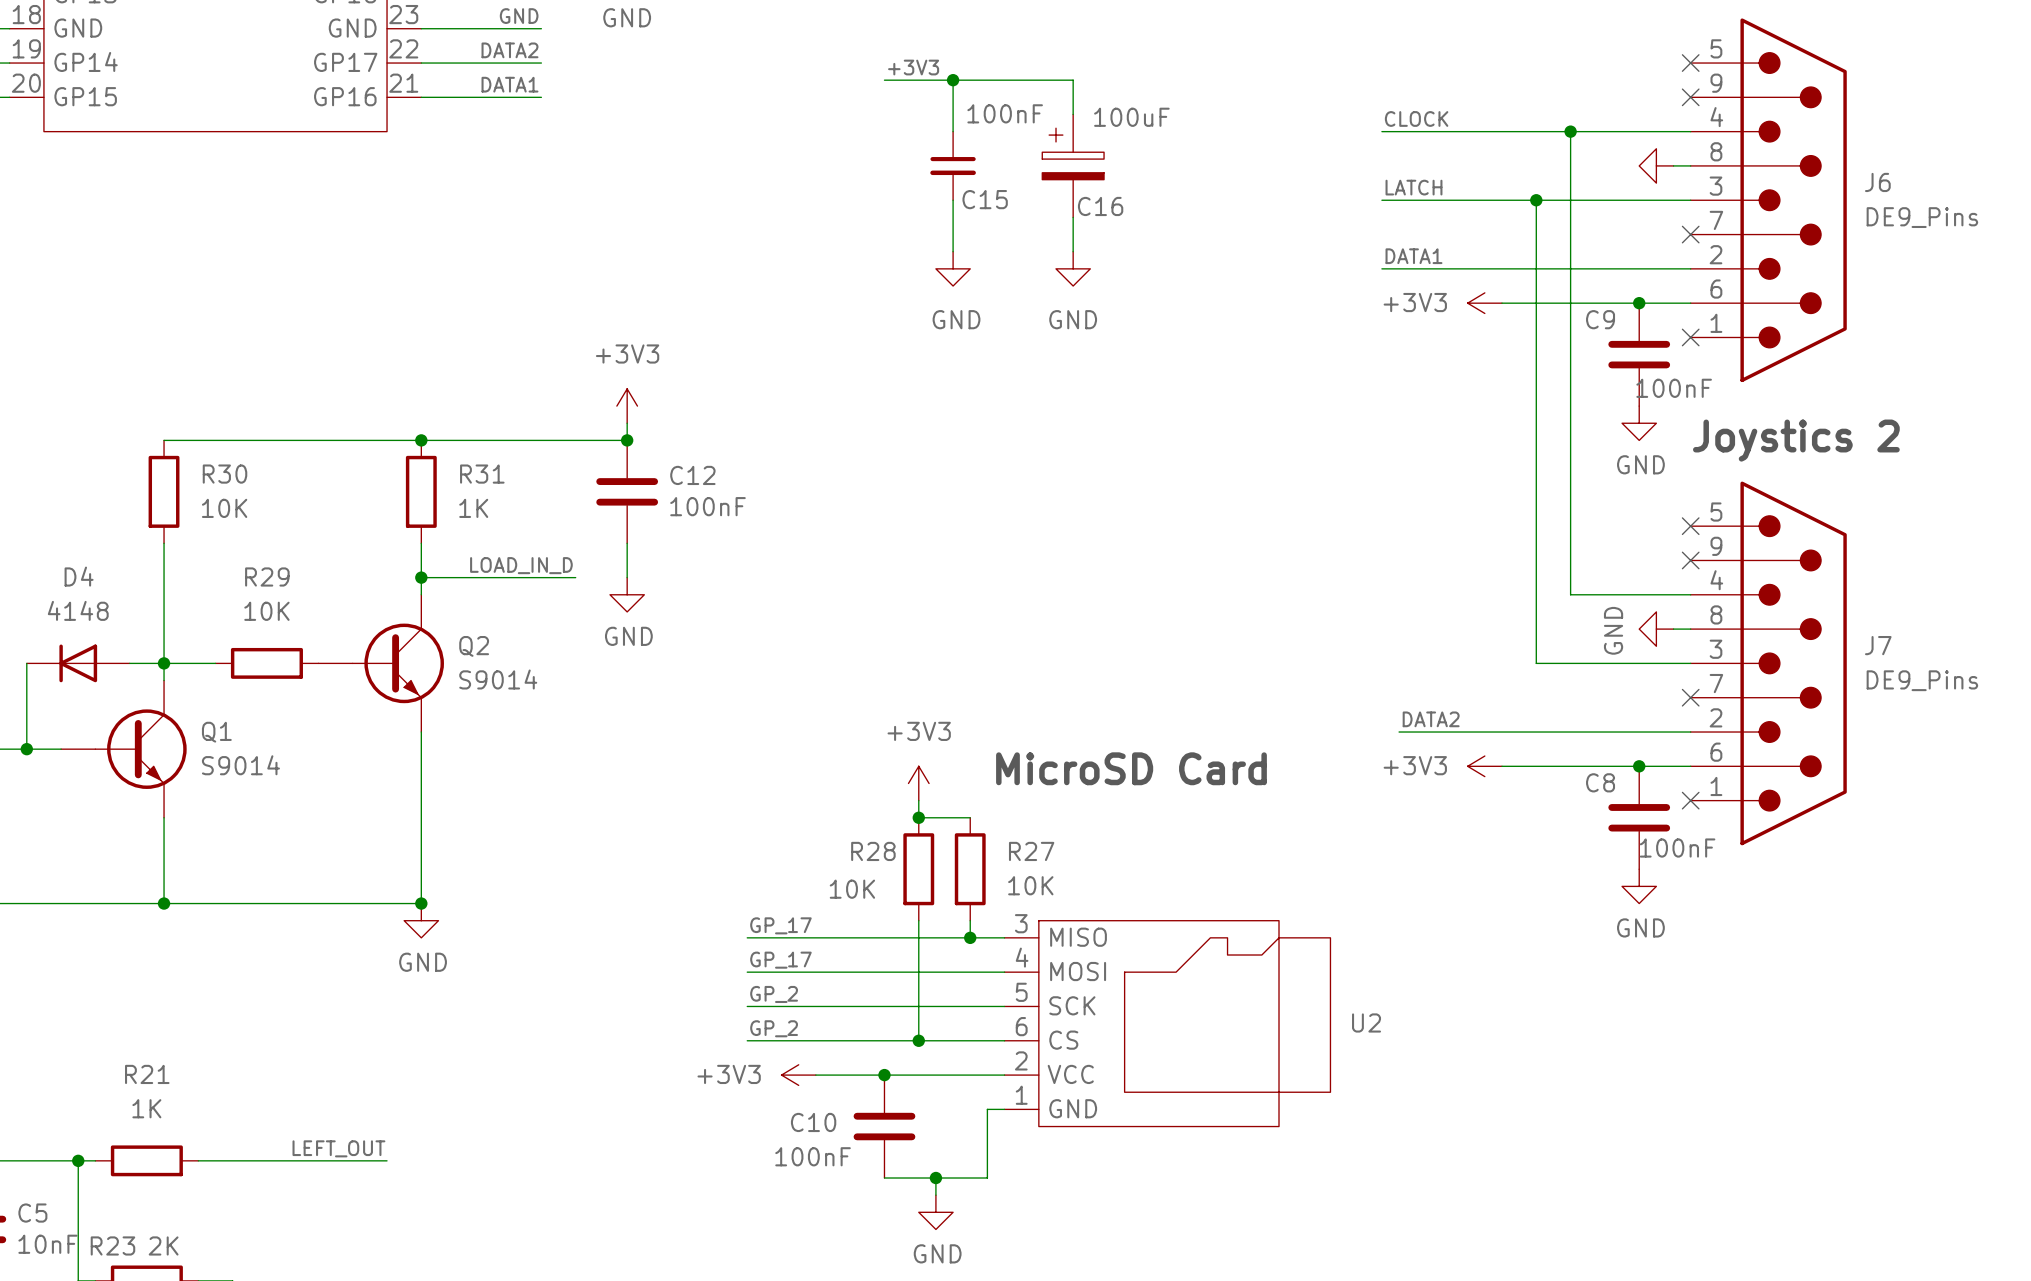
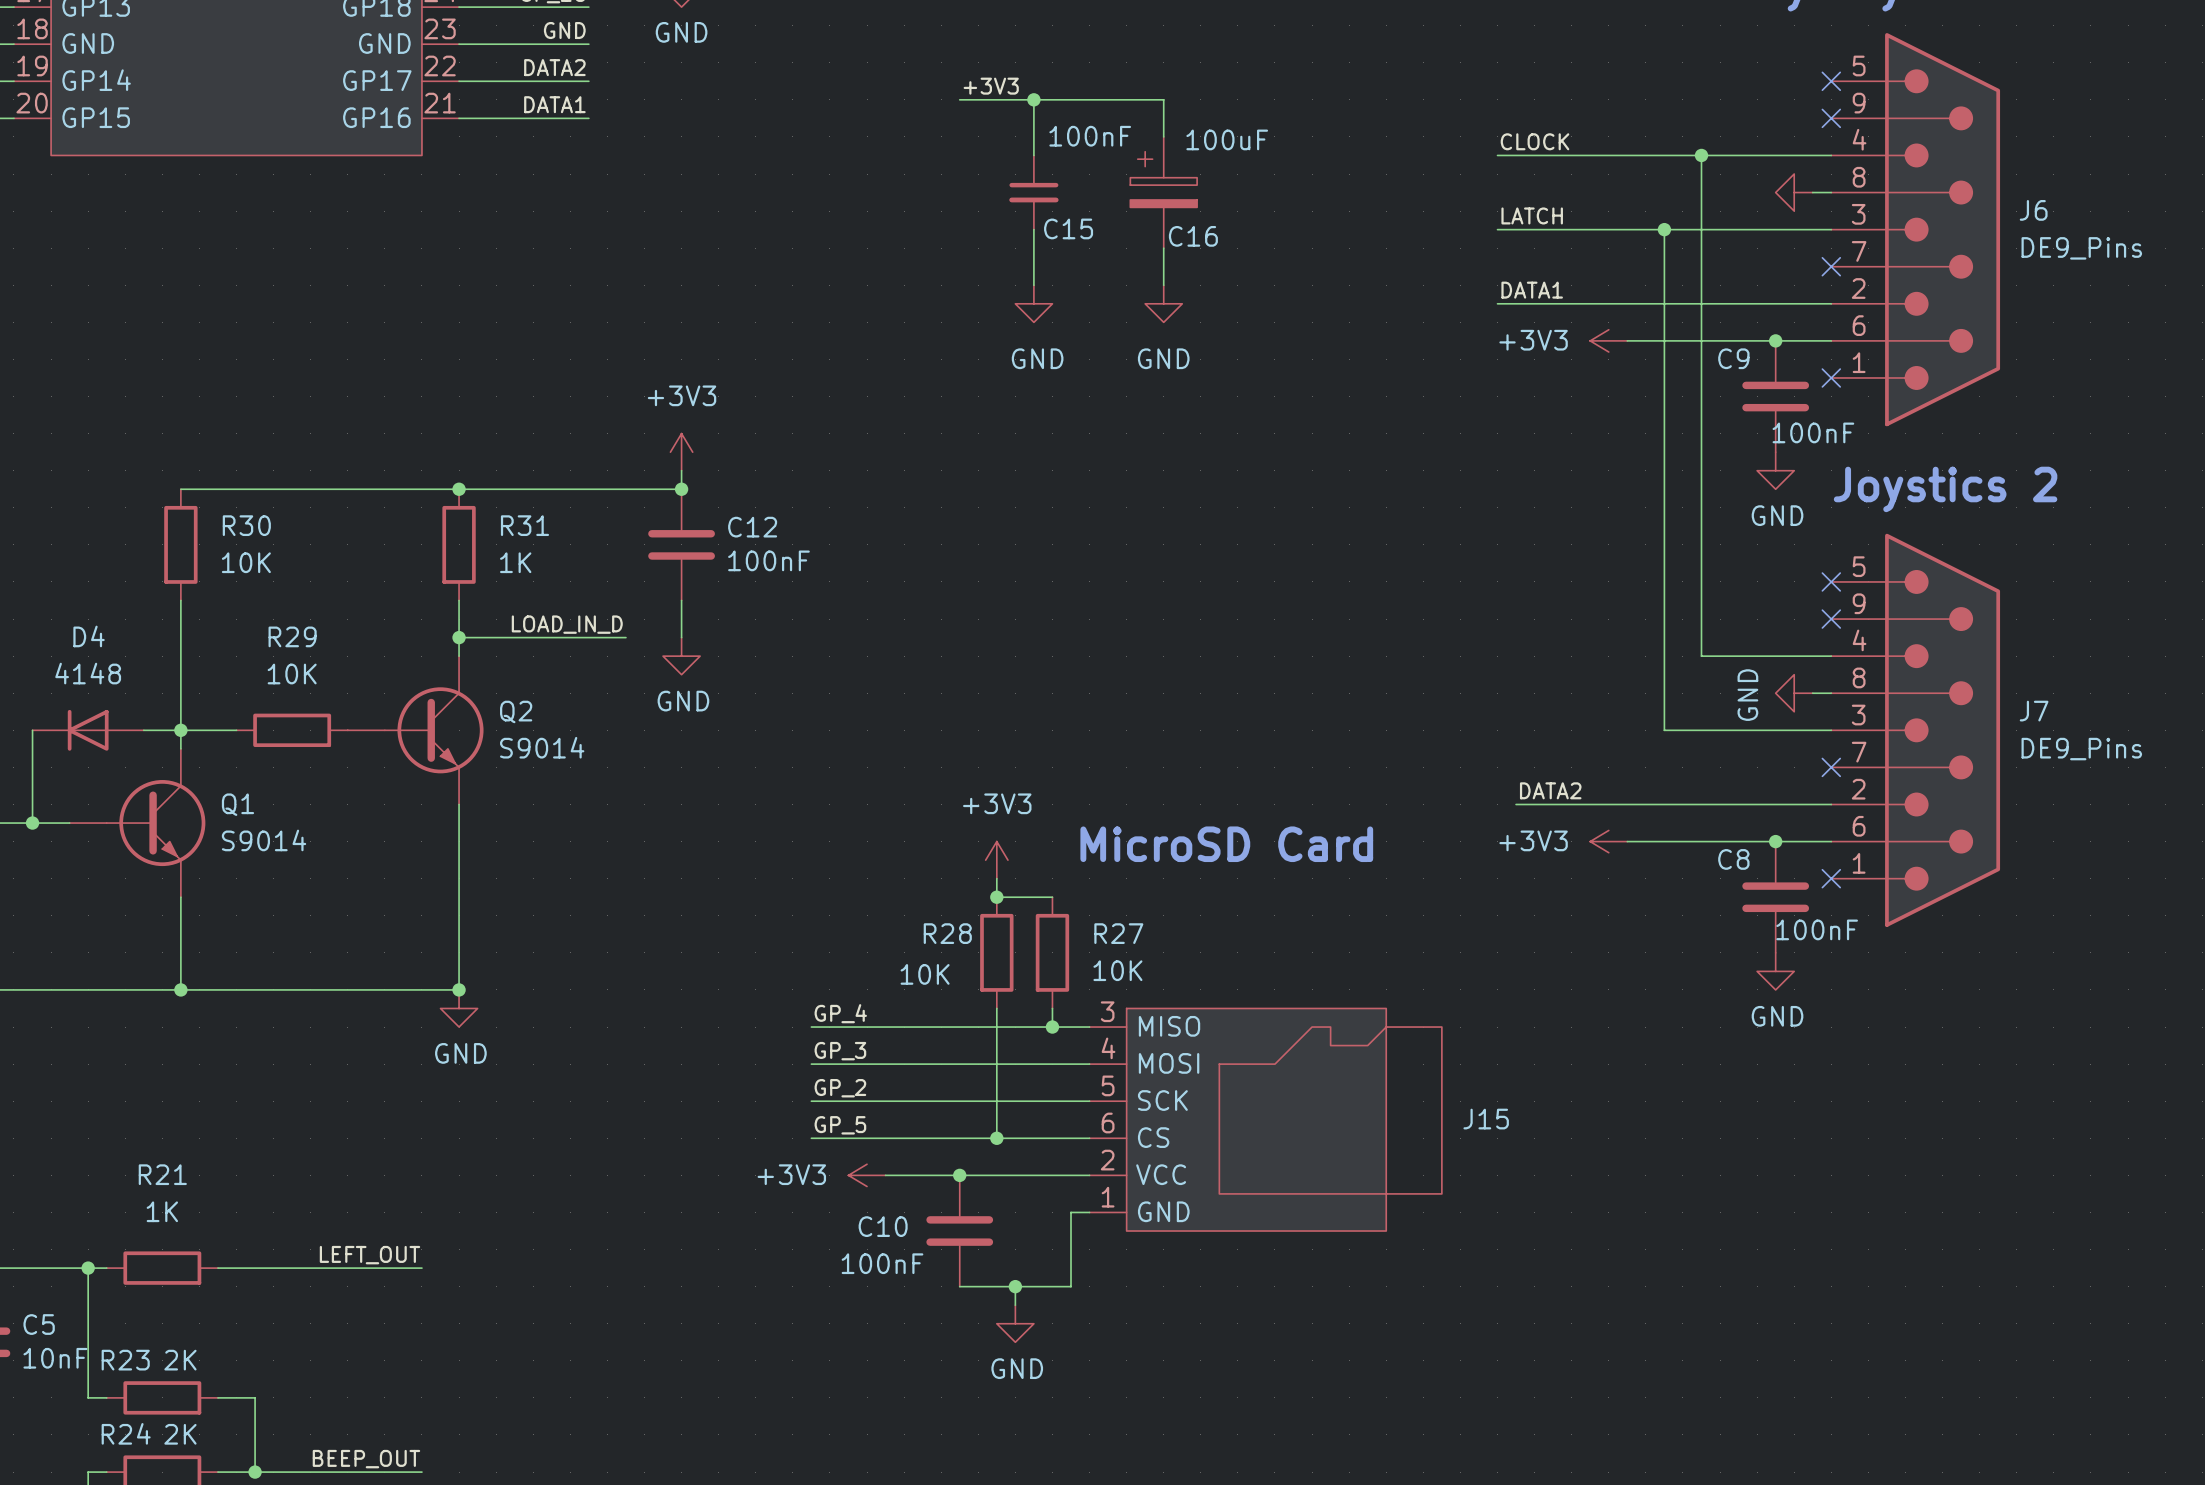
label: GP_17 (780, 925) -> GP_4 (840, 1013)
label: GP_17 (780, 960) -> GP_3 (840, 1051)
U2 name: U2 (1366, 1022) -> J15 (1486, 1119)
label: GP_2 (774, 1028) -> GP_5 (840, 1125)

